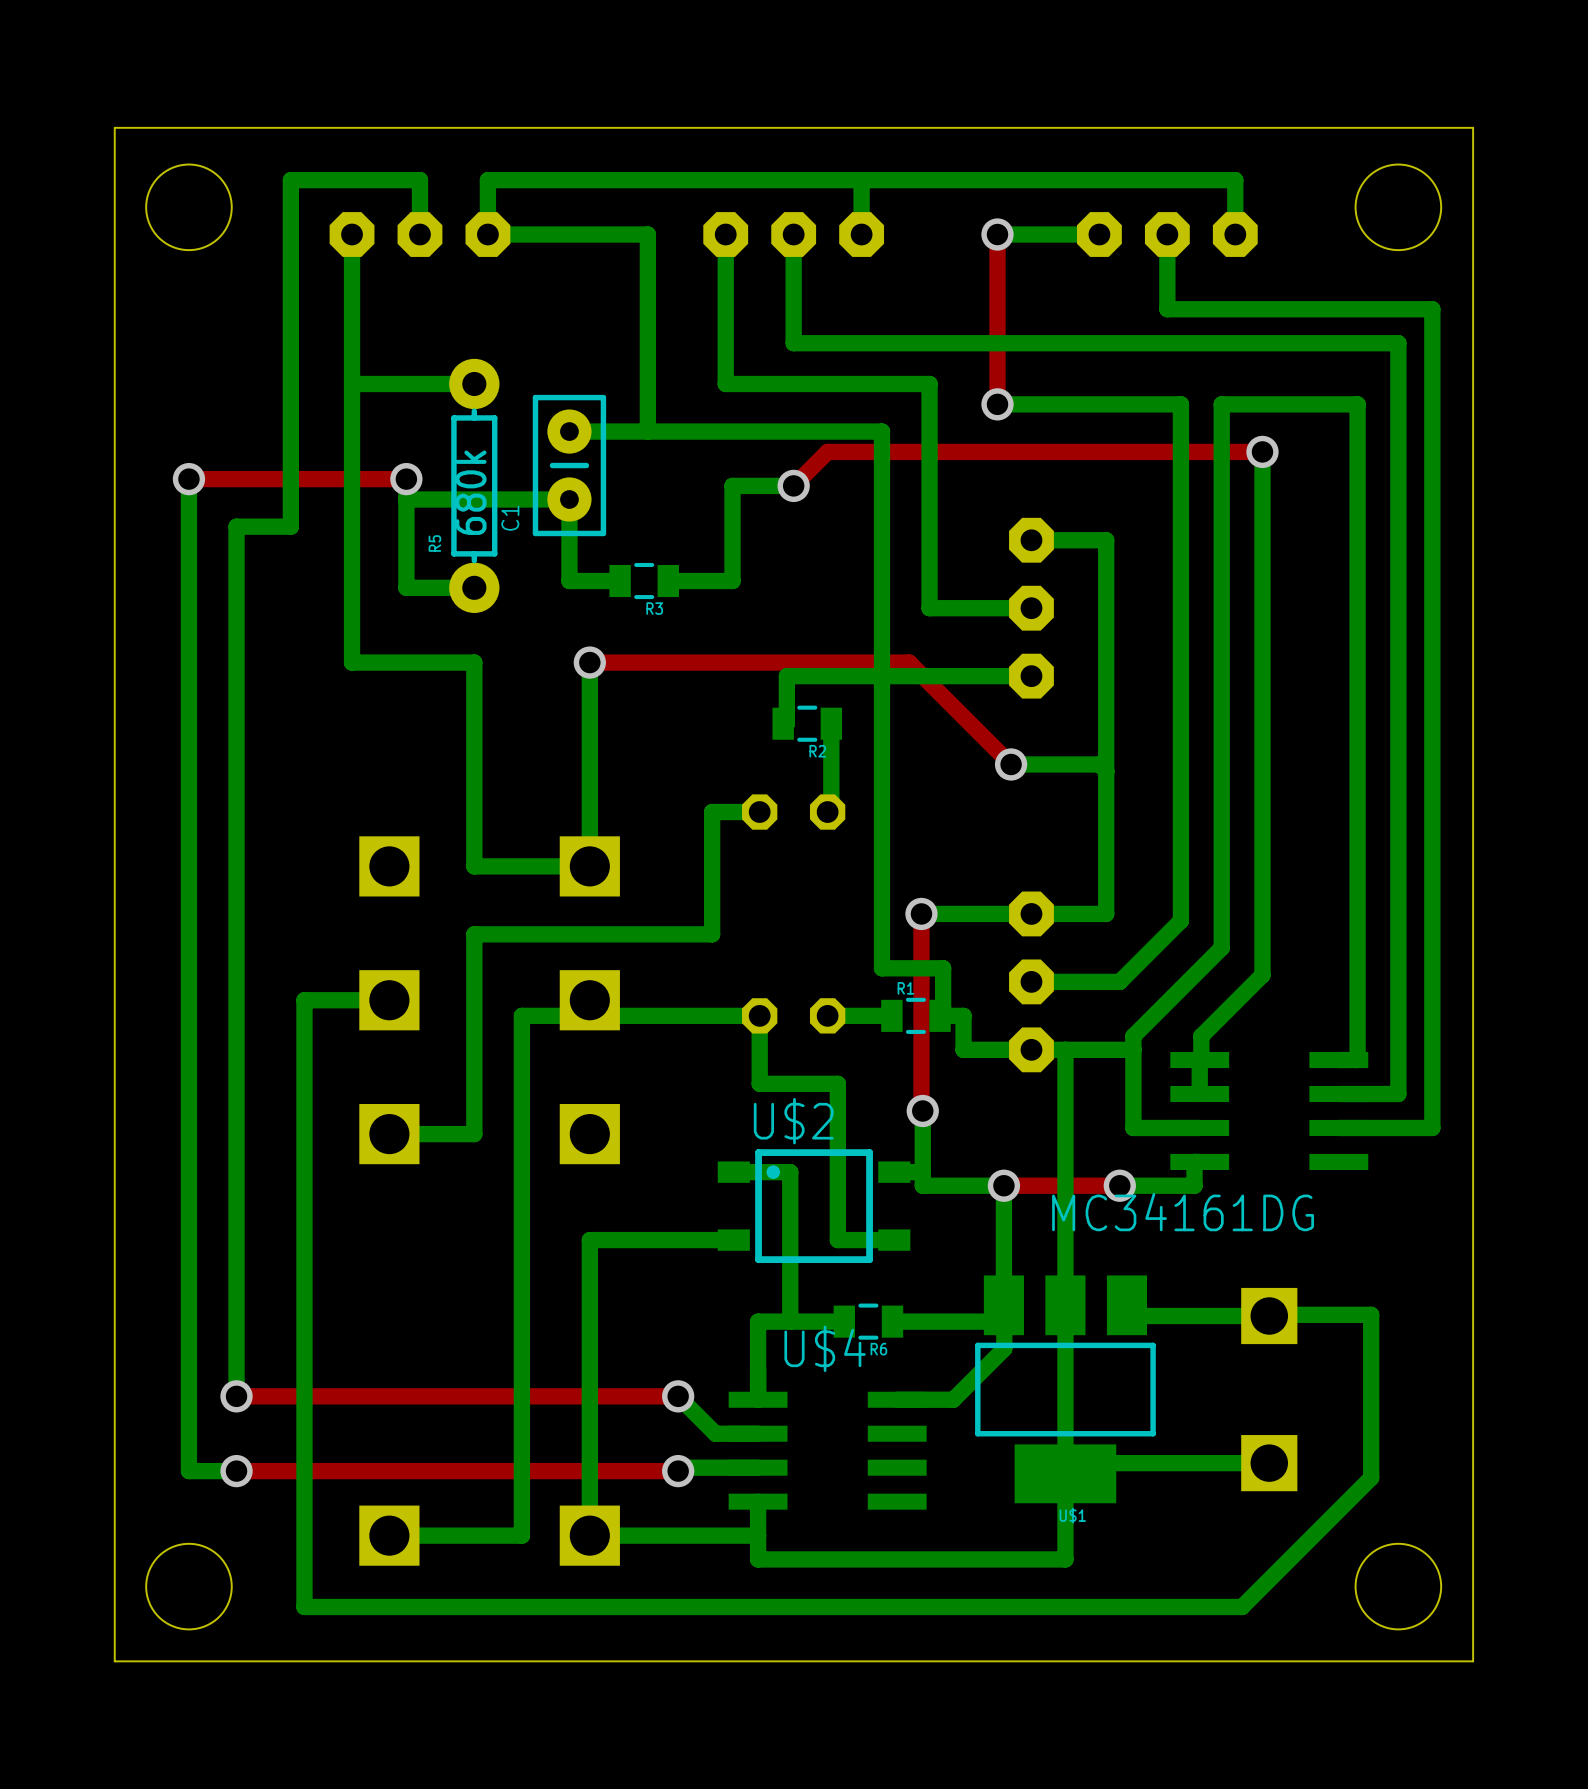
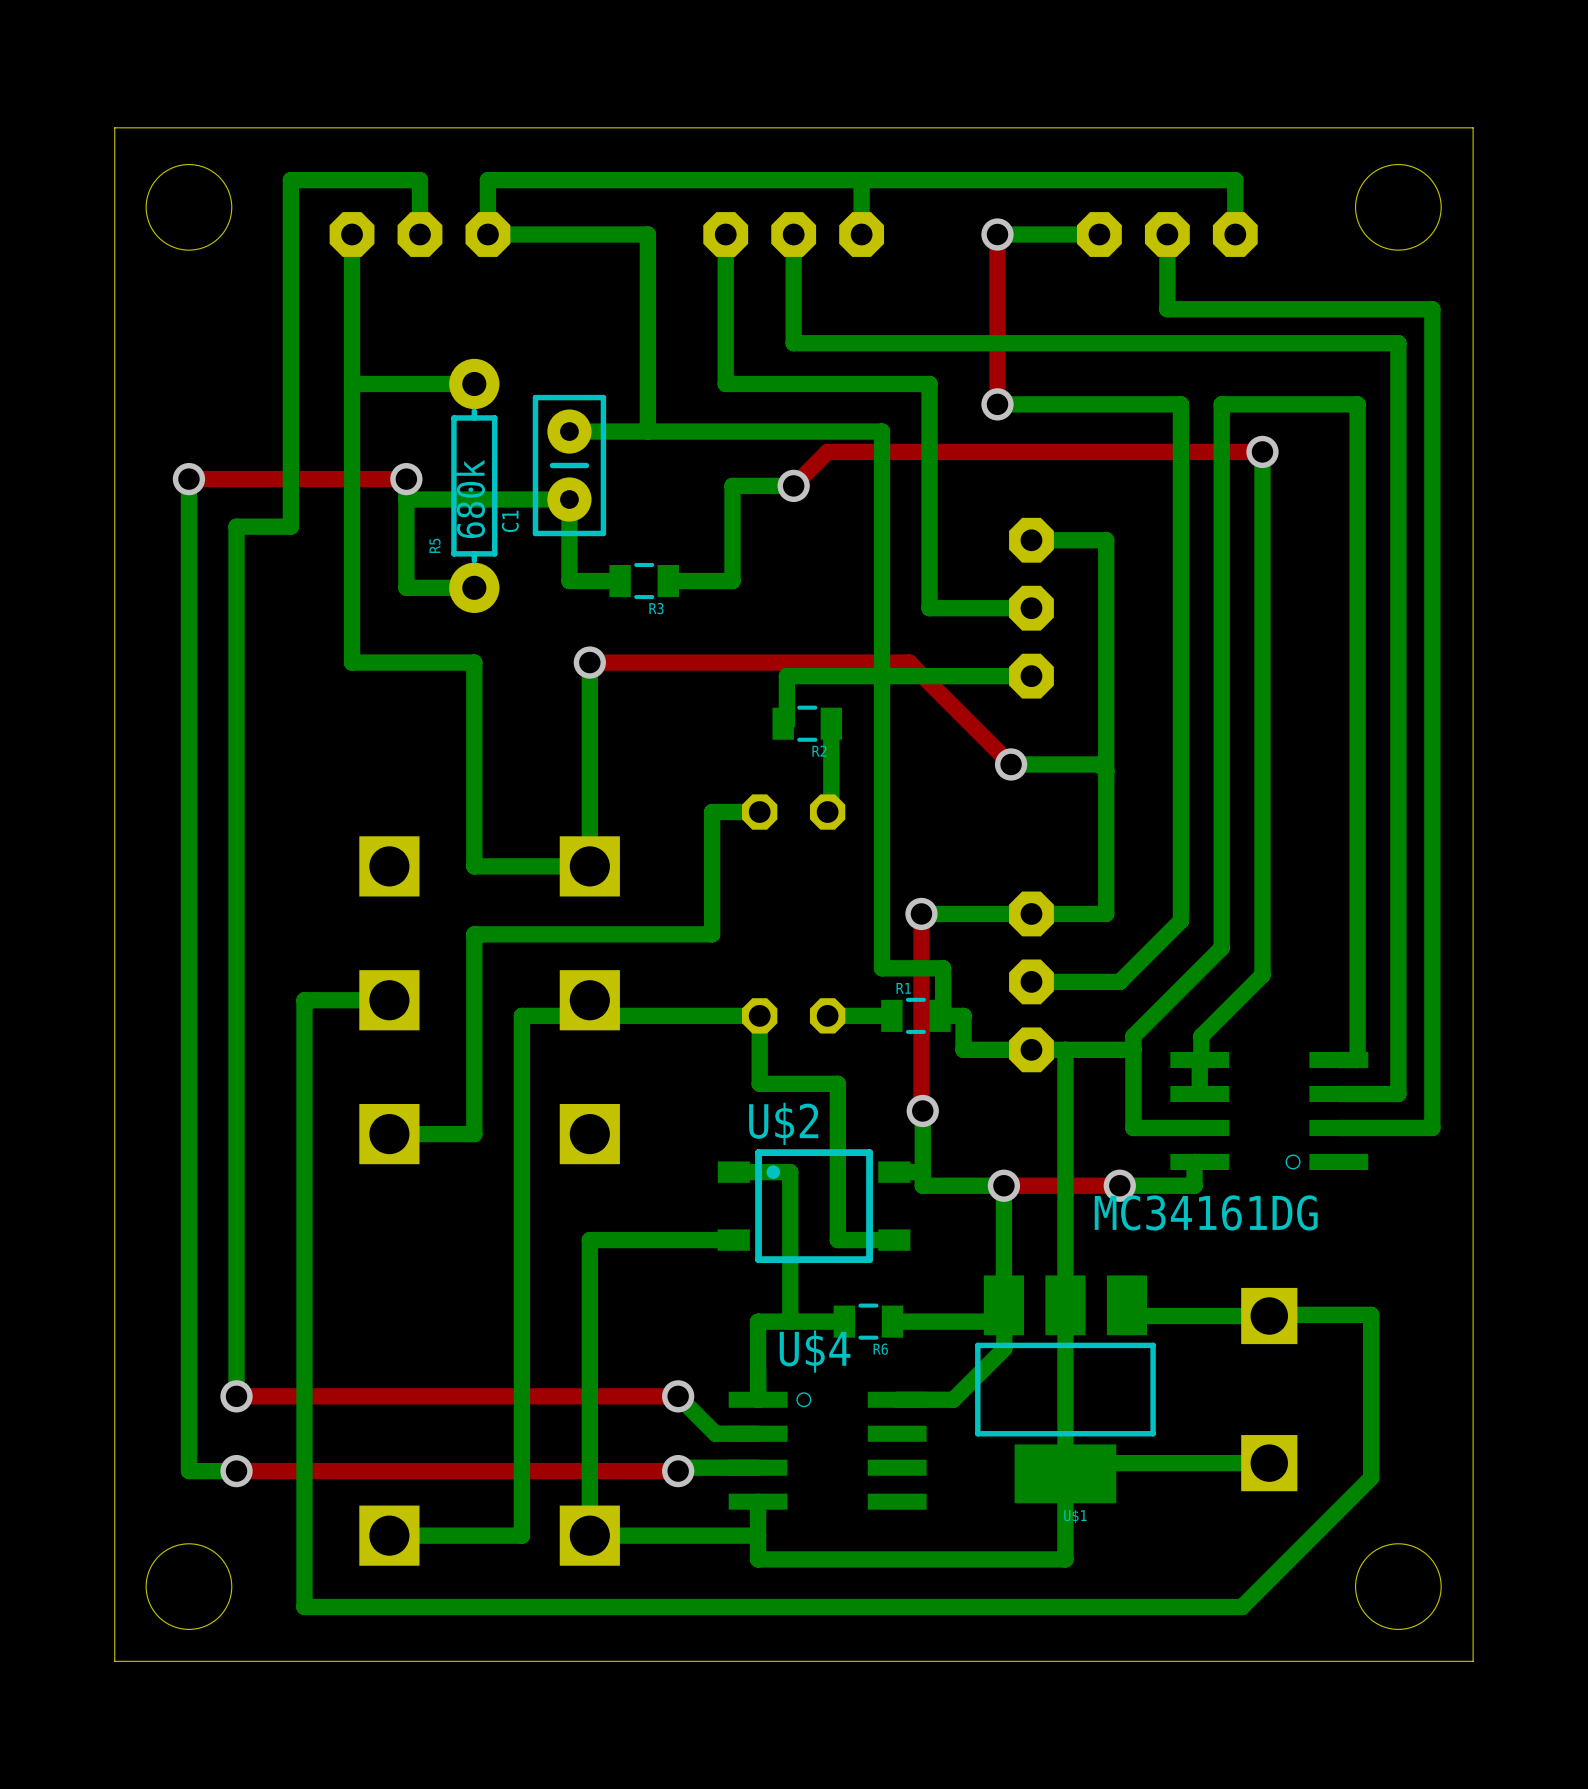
MC34161DG footprint: [1170, 1052, 1369, 1170] -> [1170, 1052, 1369, 1170]
U$4 footprint: [728, 1391, 927, 1510] -> [728, 1391, 927, 1510]

